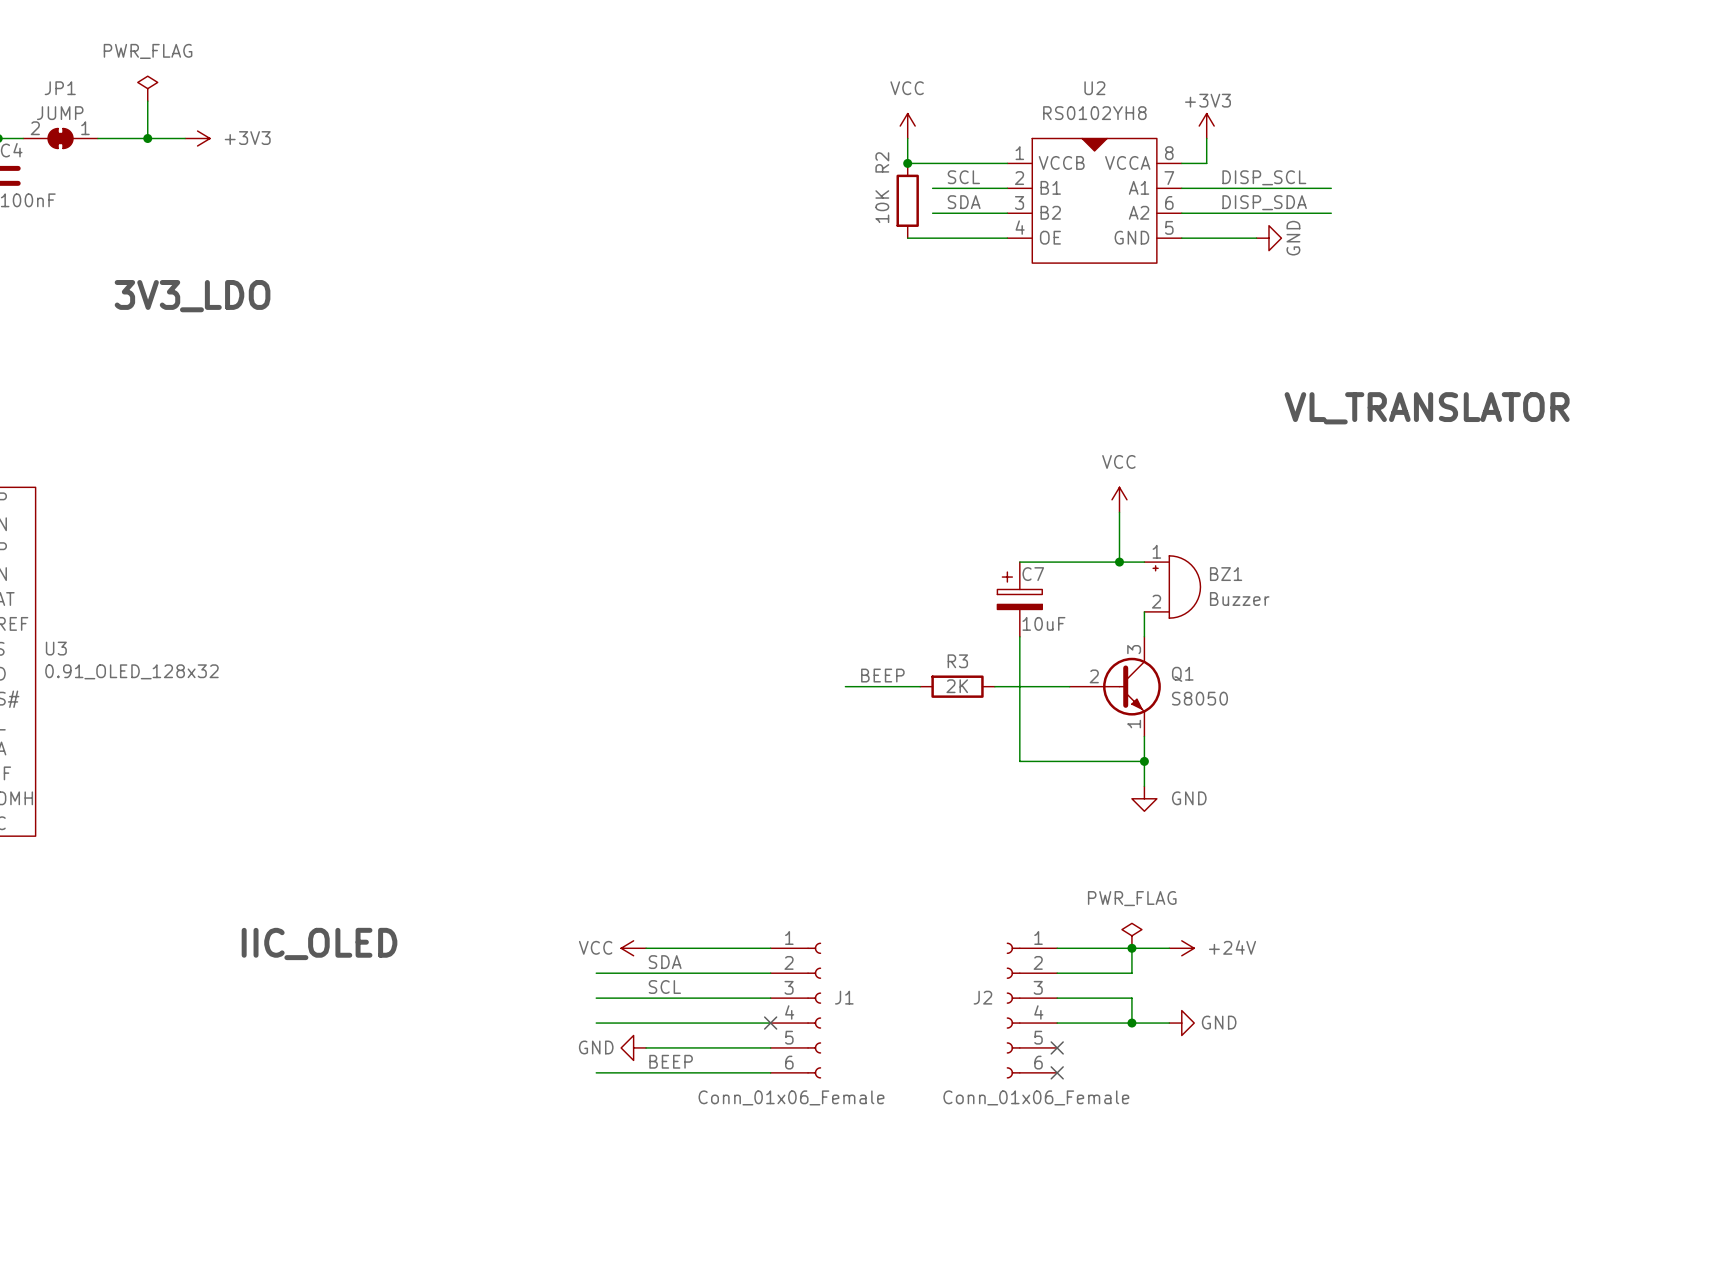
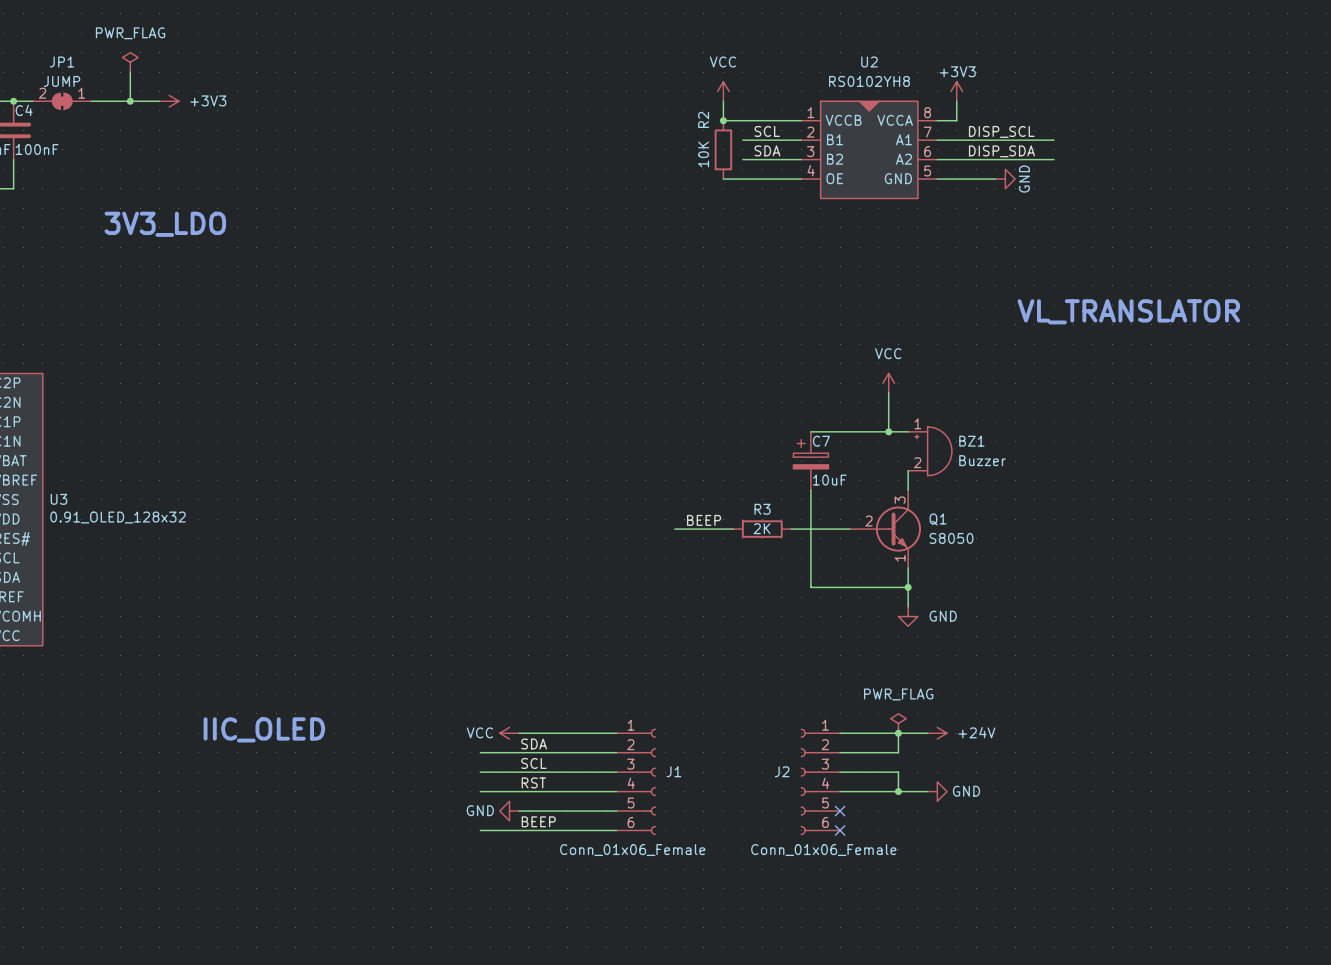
label: none -> RST (533, 782)
no-connect mark: (770, 1023) -> none

